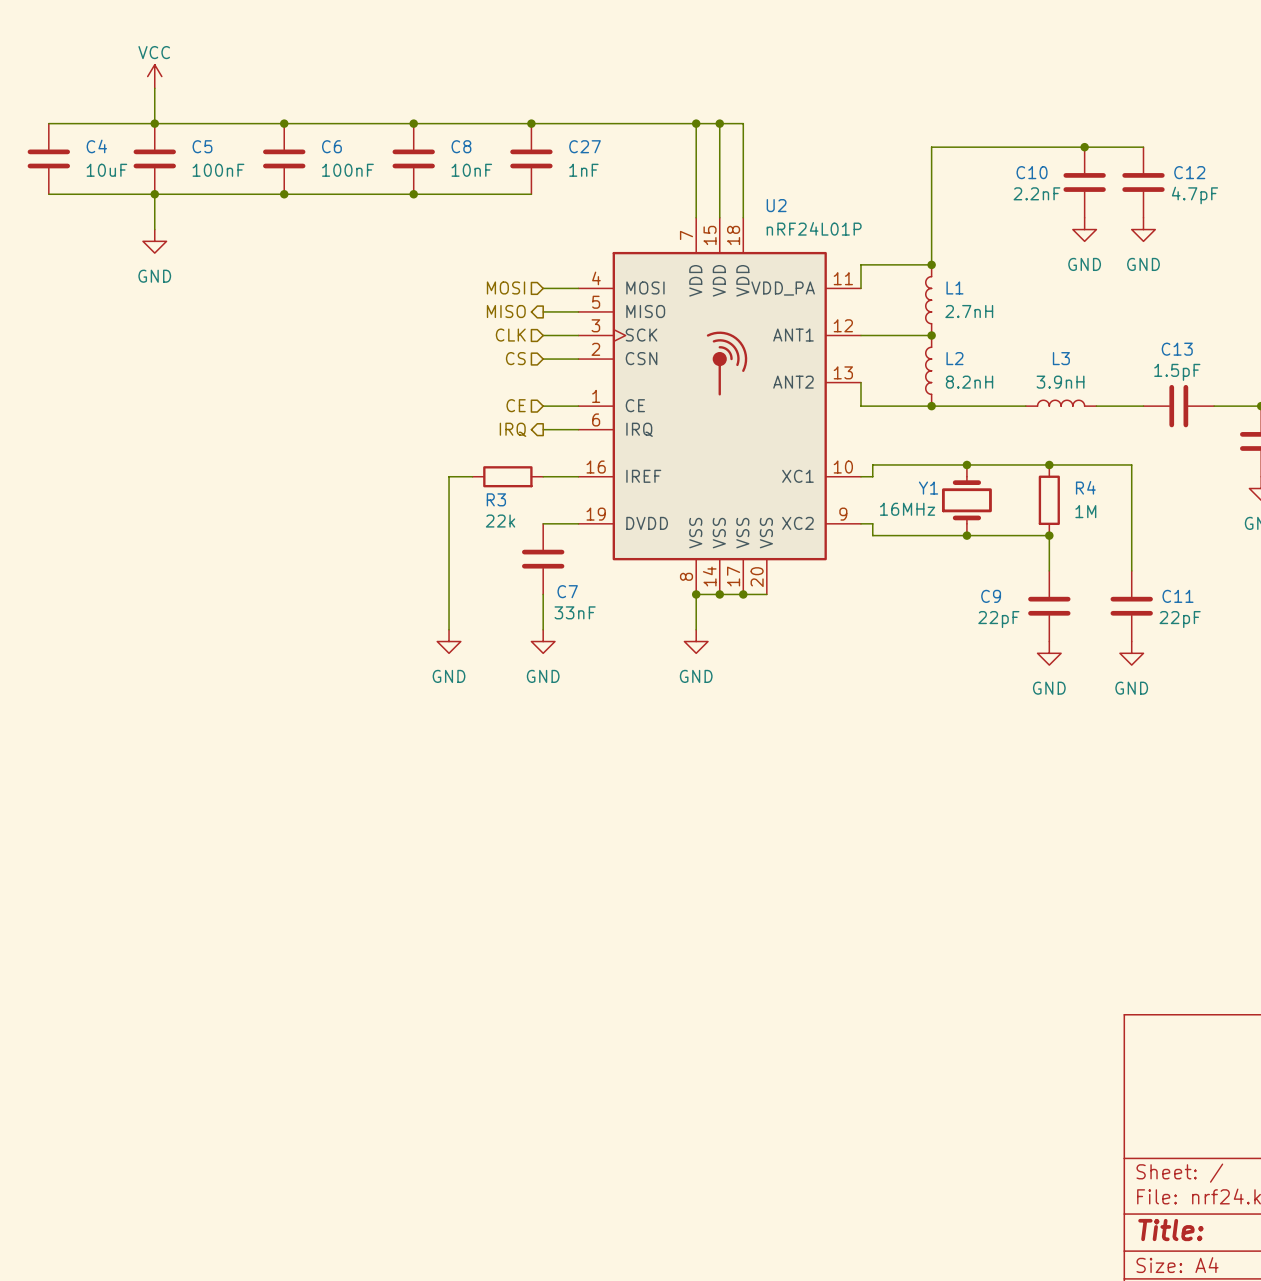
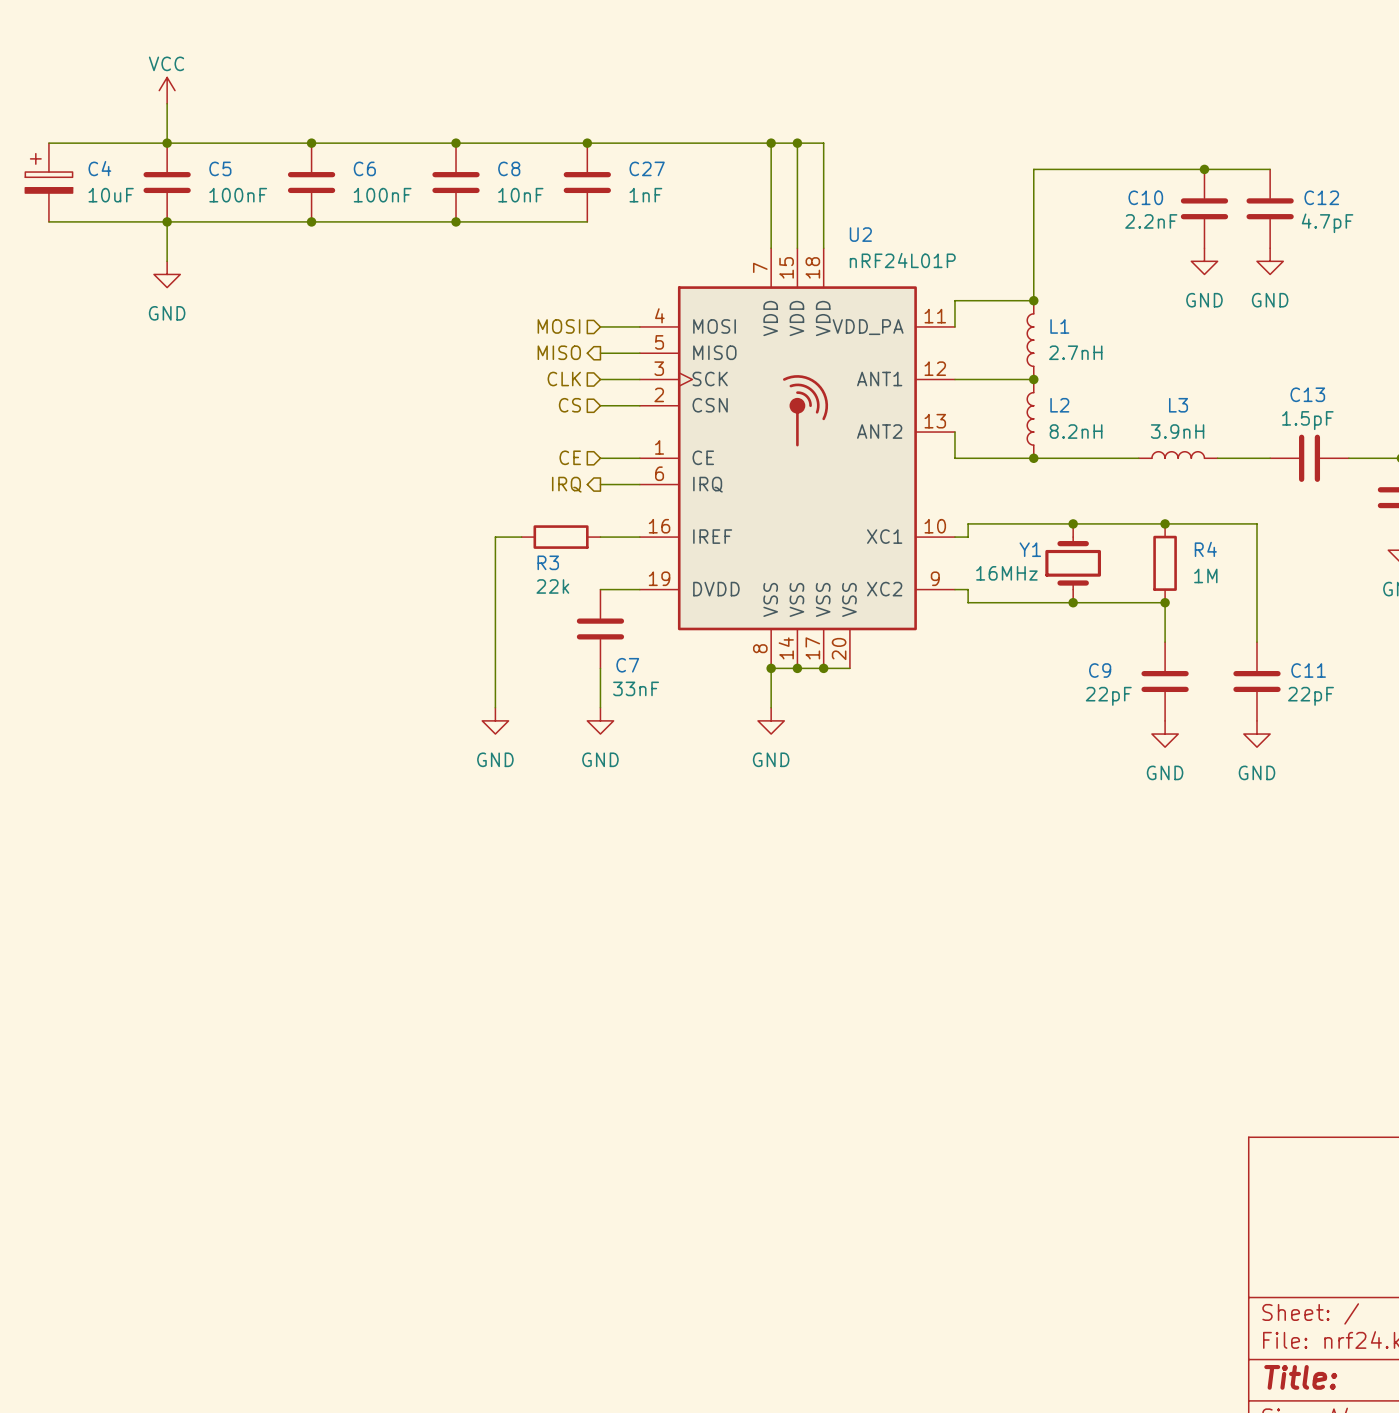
C4 symbol: [27, 123, 71, 195] -> [25, 143, 73, 222]

